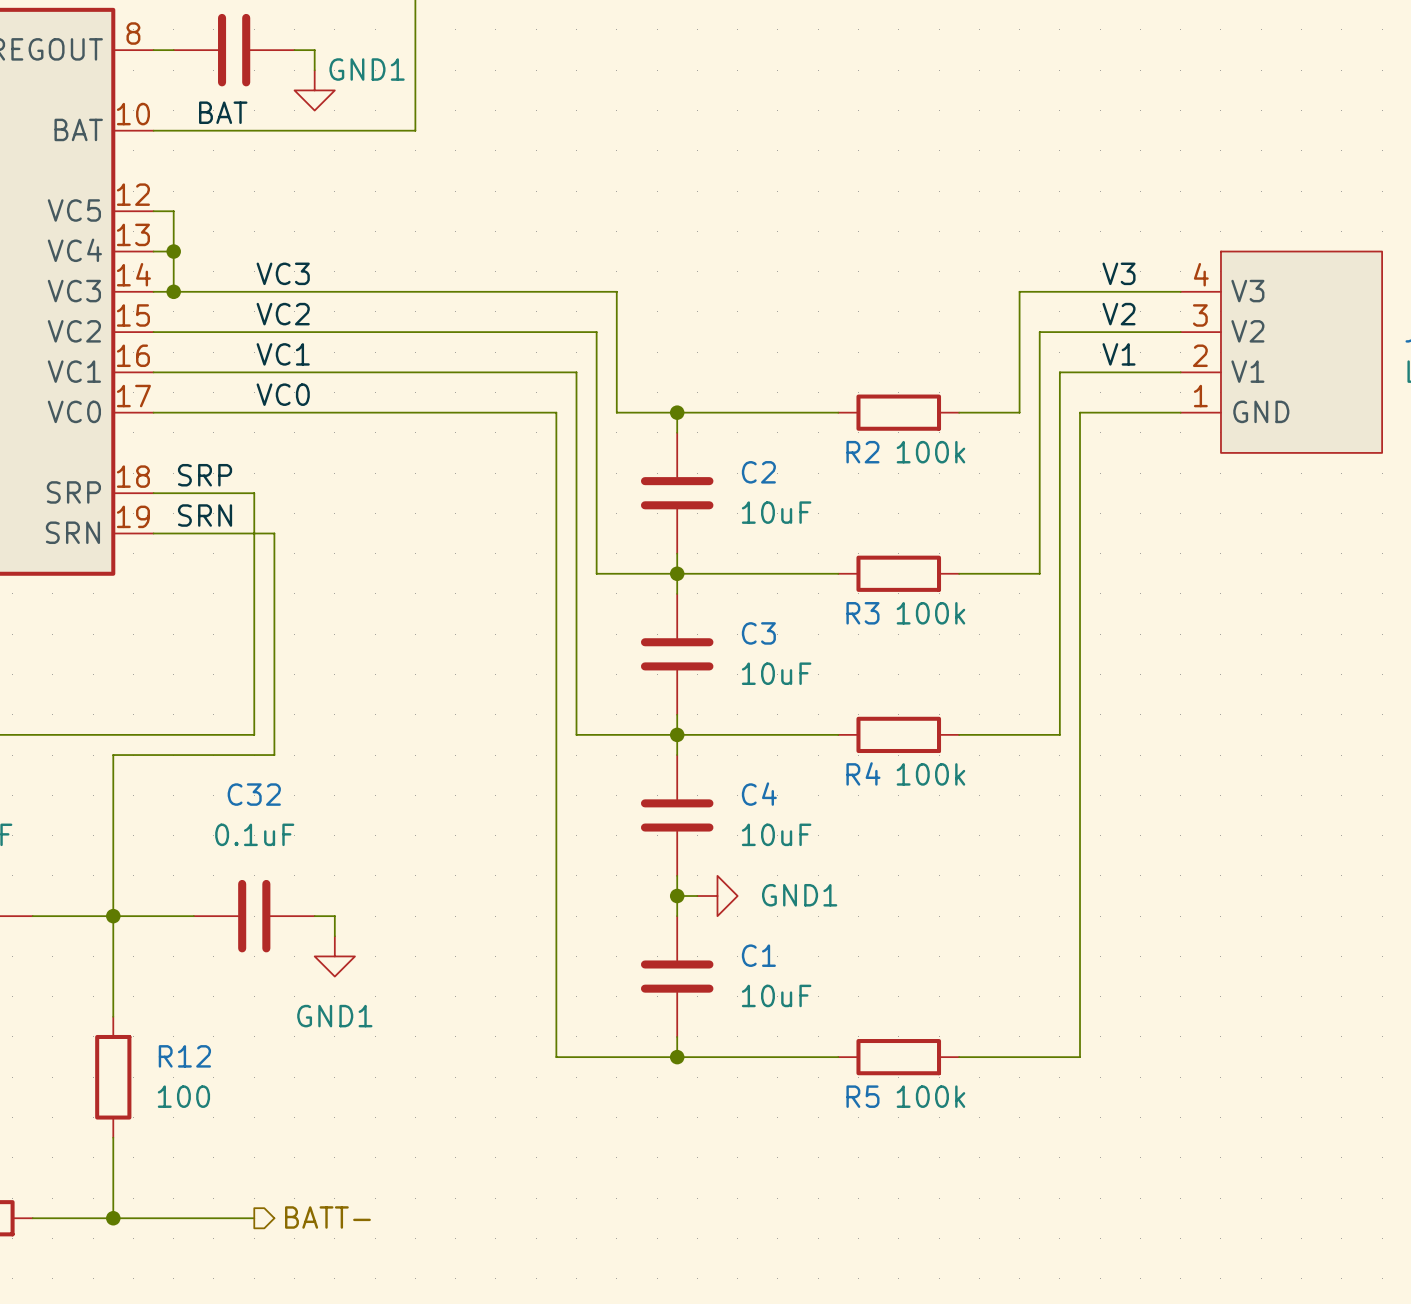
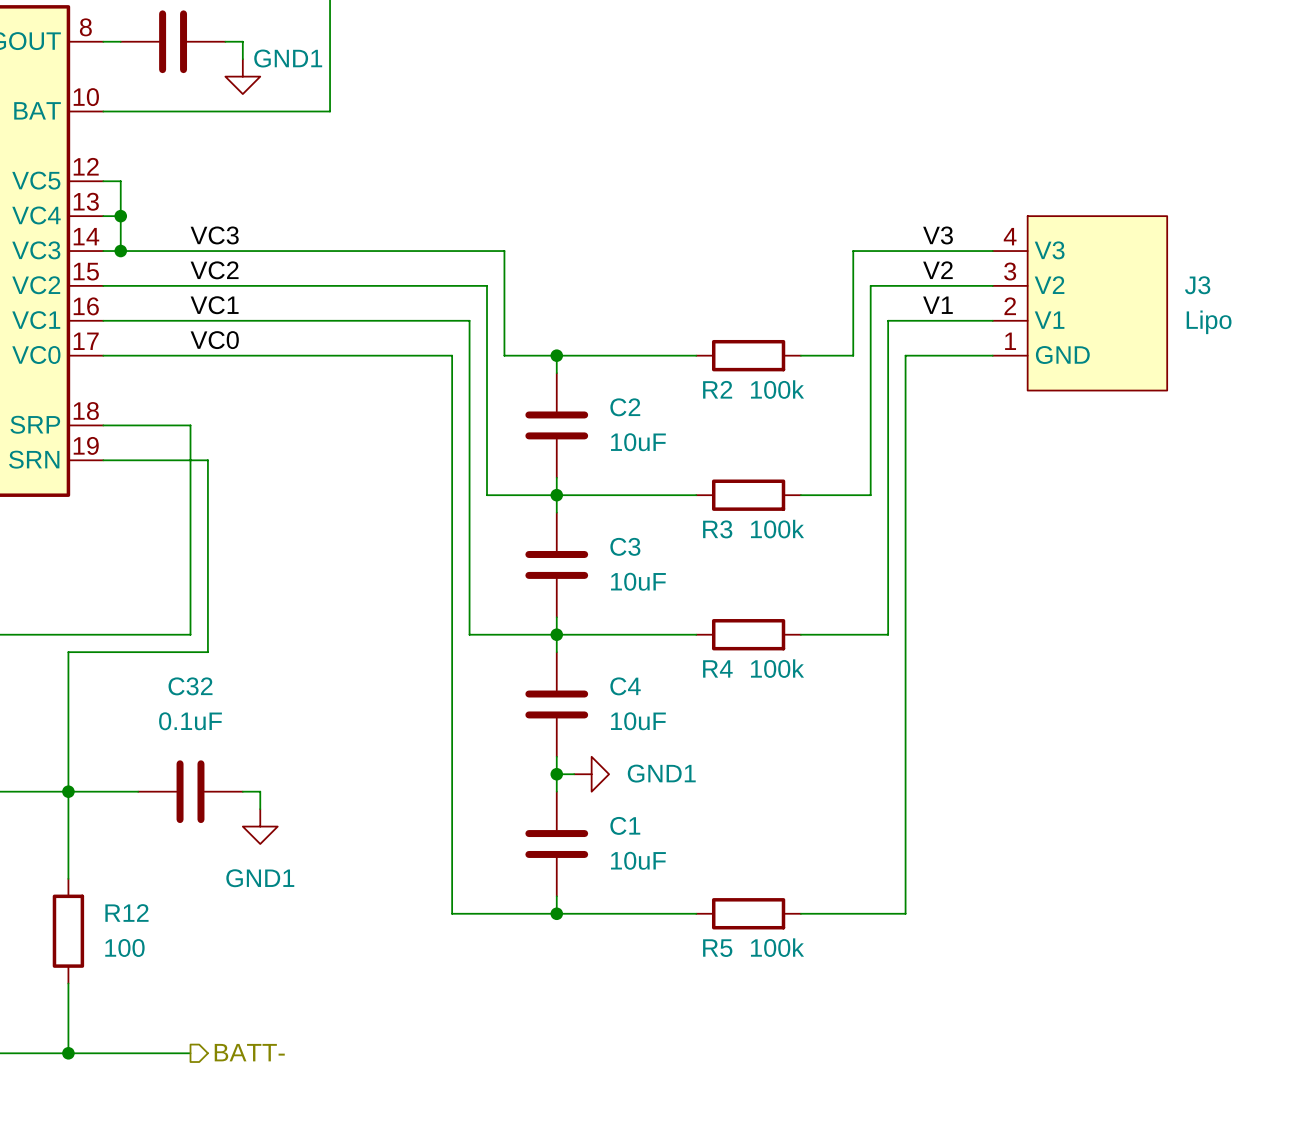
label: BAT (223, 112) -> none
label: SRP (205, 475) -> none
label: SRN (205, 515) -> none

